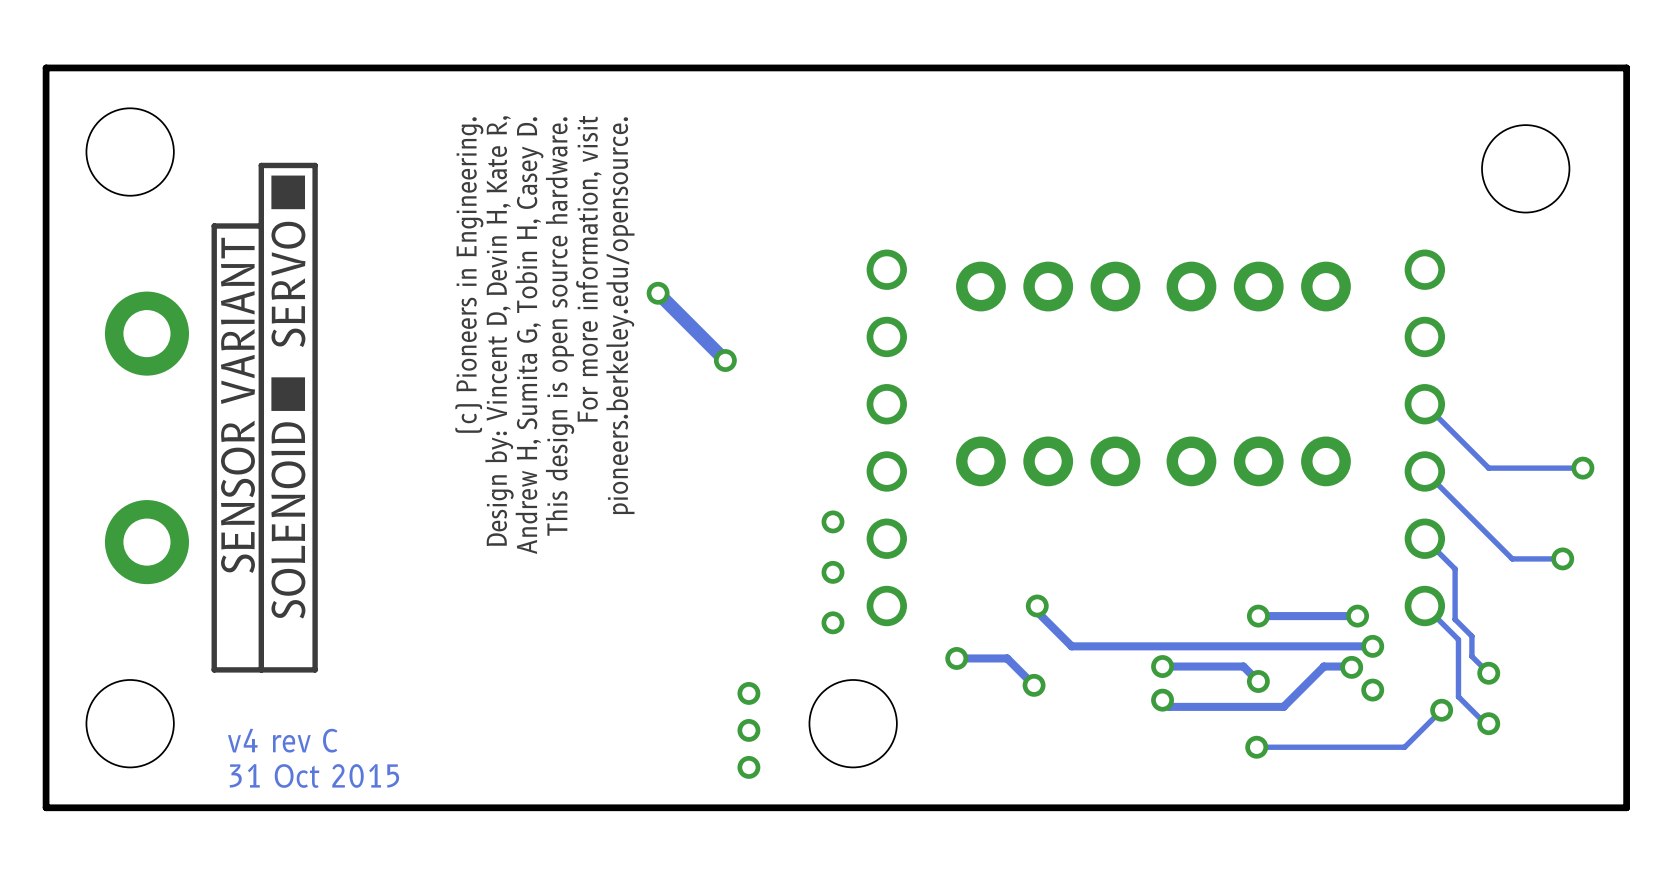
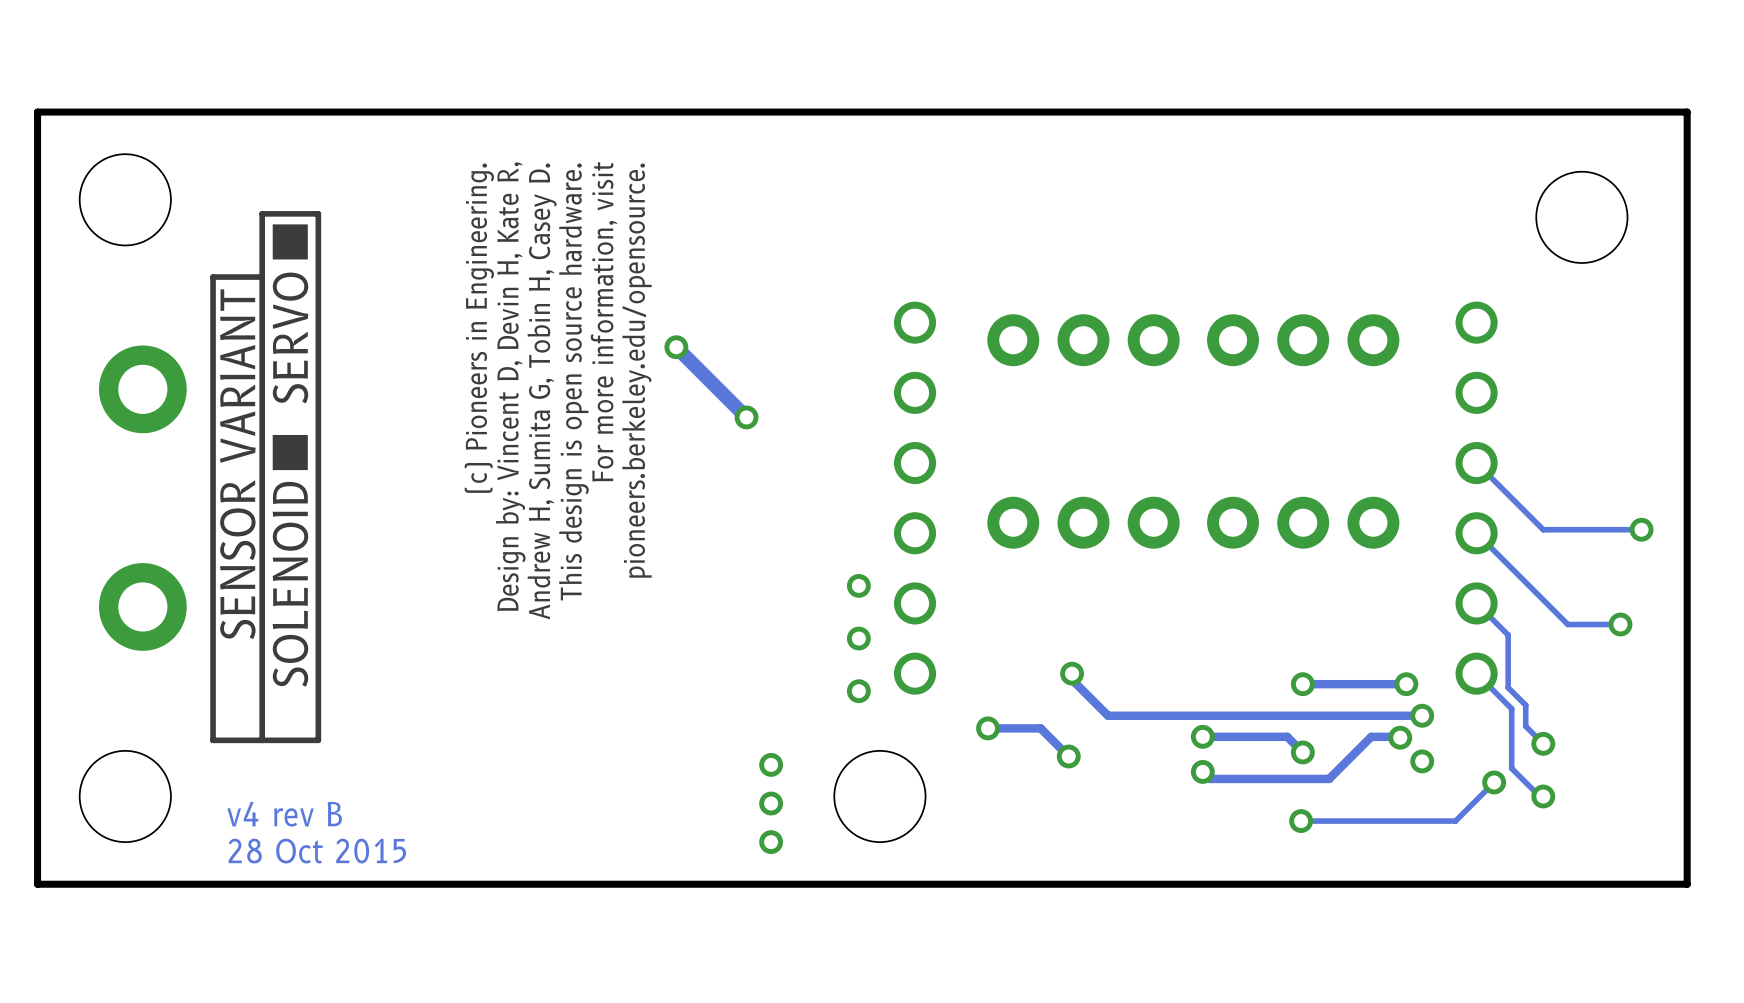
text: v4 rev C (282, 740) -> v4 rev B (284, 814)
text: 31 Oct 2015 (314, 775) -> 28 Oct 2015 (317, 851)

